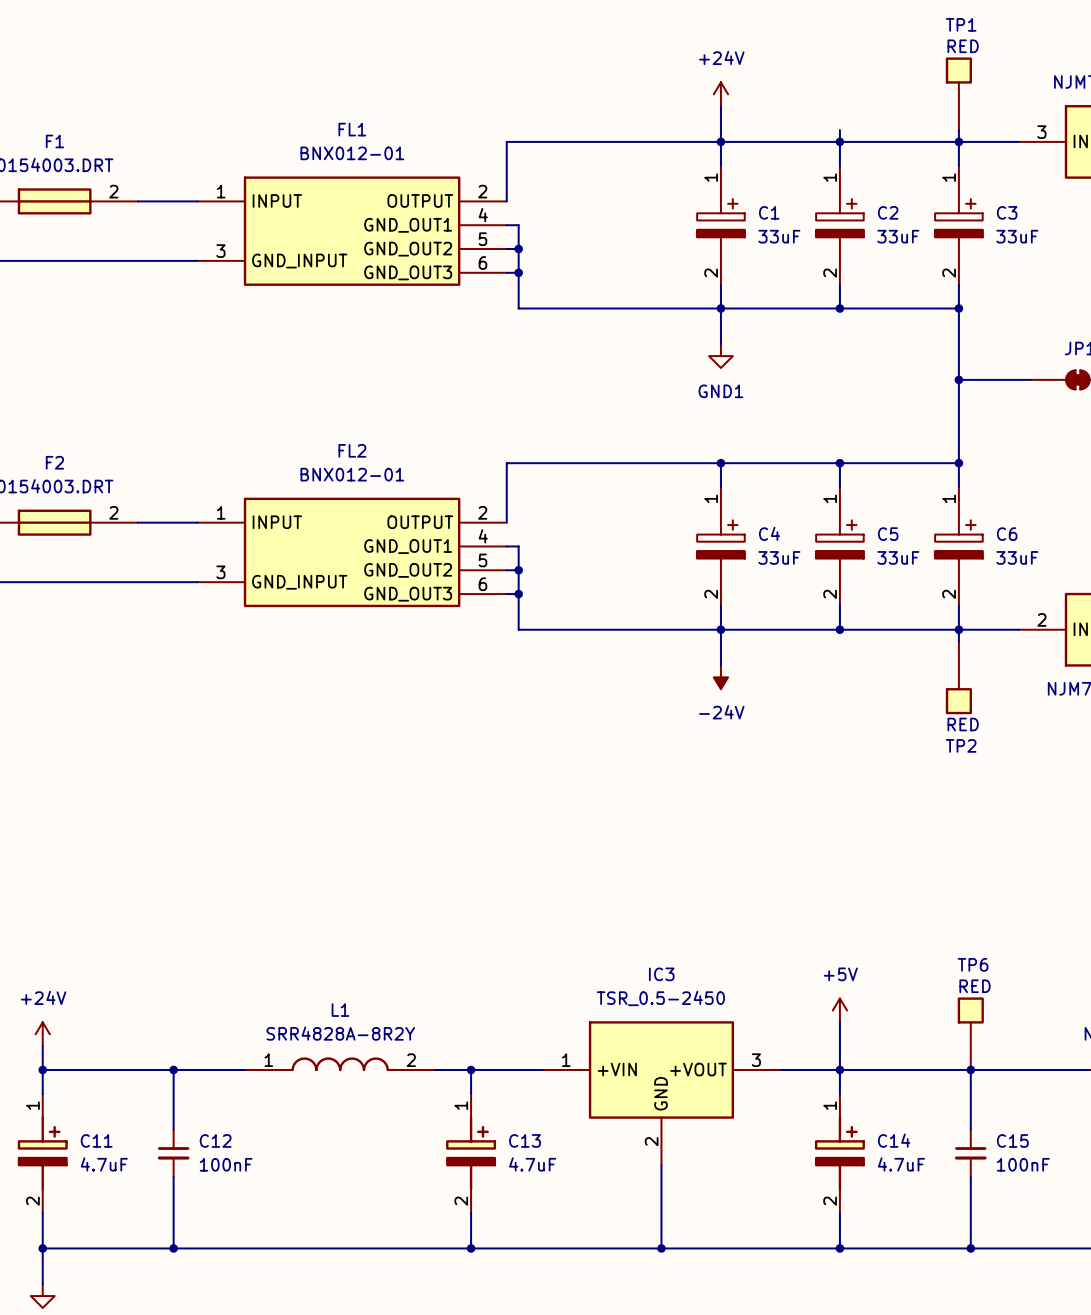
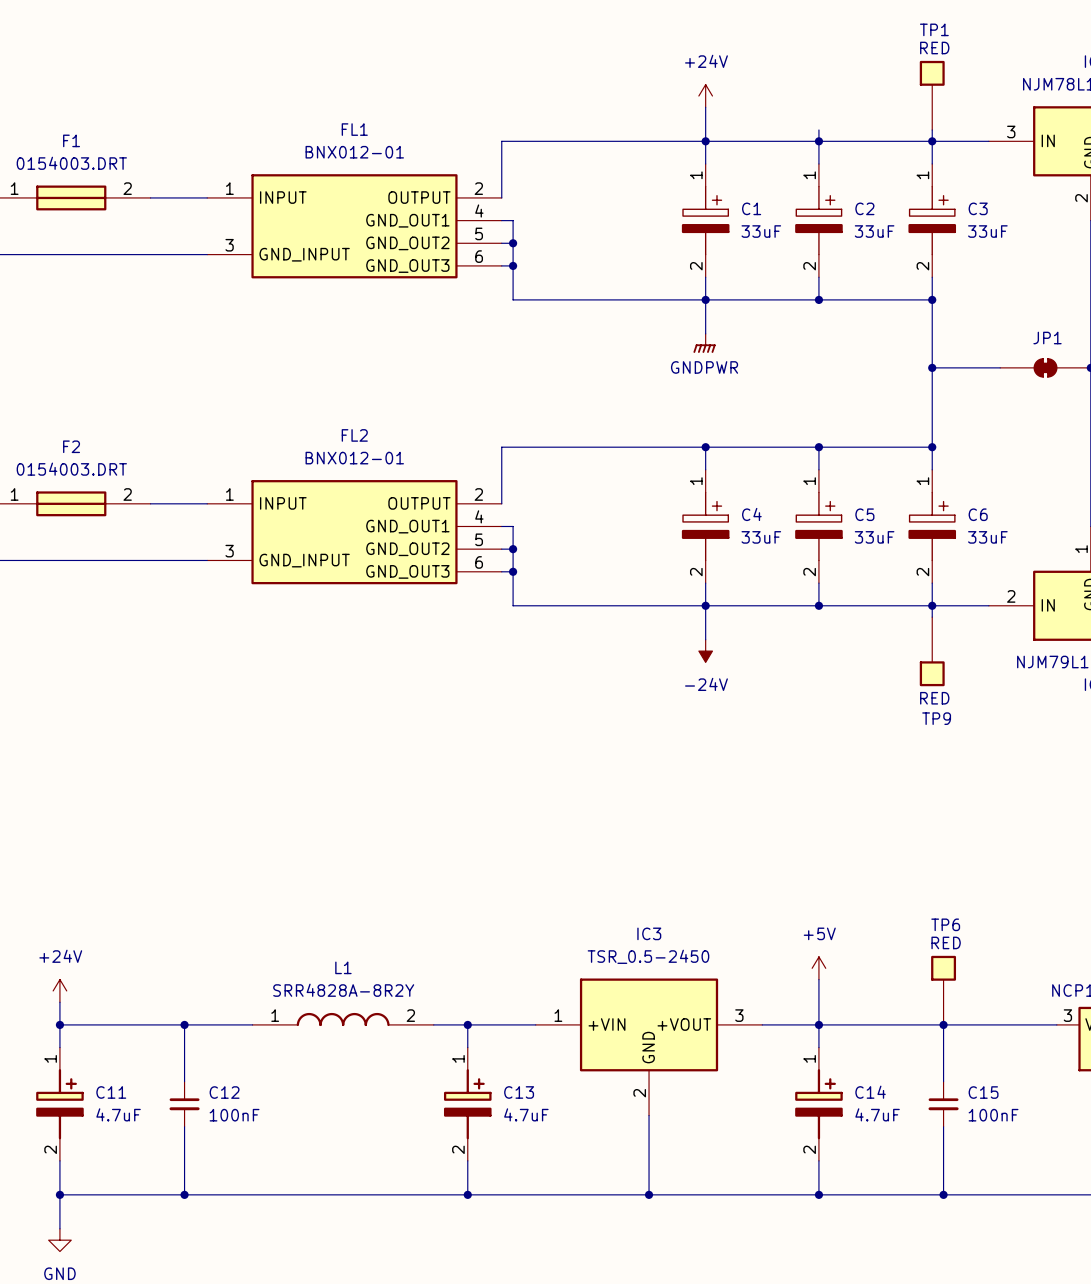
TP1 text: none -> RED (934, 48)
TP1 value: RED (963, 46) -> none
power symbol: GND1 (720, 356) -> GNDPWR (704, 343)
TP2 value: RED (963, 724) -> none
TP2 text: none -> RED (934, 698)
TP2 name: TP2 (961, 745) -> TP9 (936, 718)
TP6 text: none -> RED (946, 942)
TP6 value: RED (975, 986) -> none

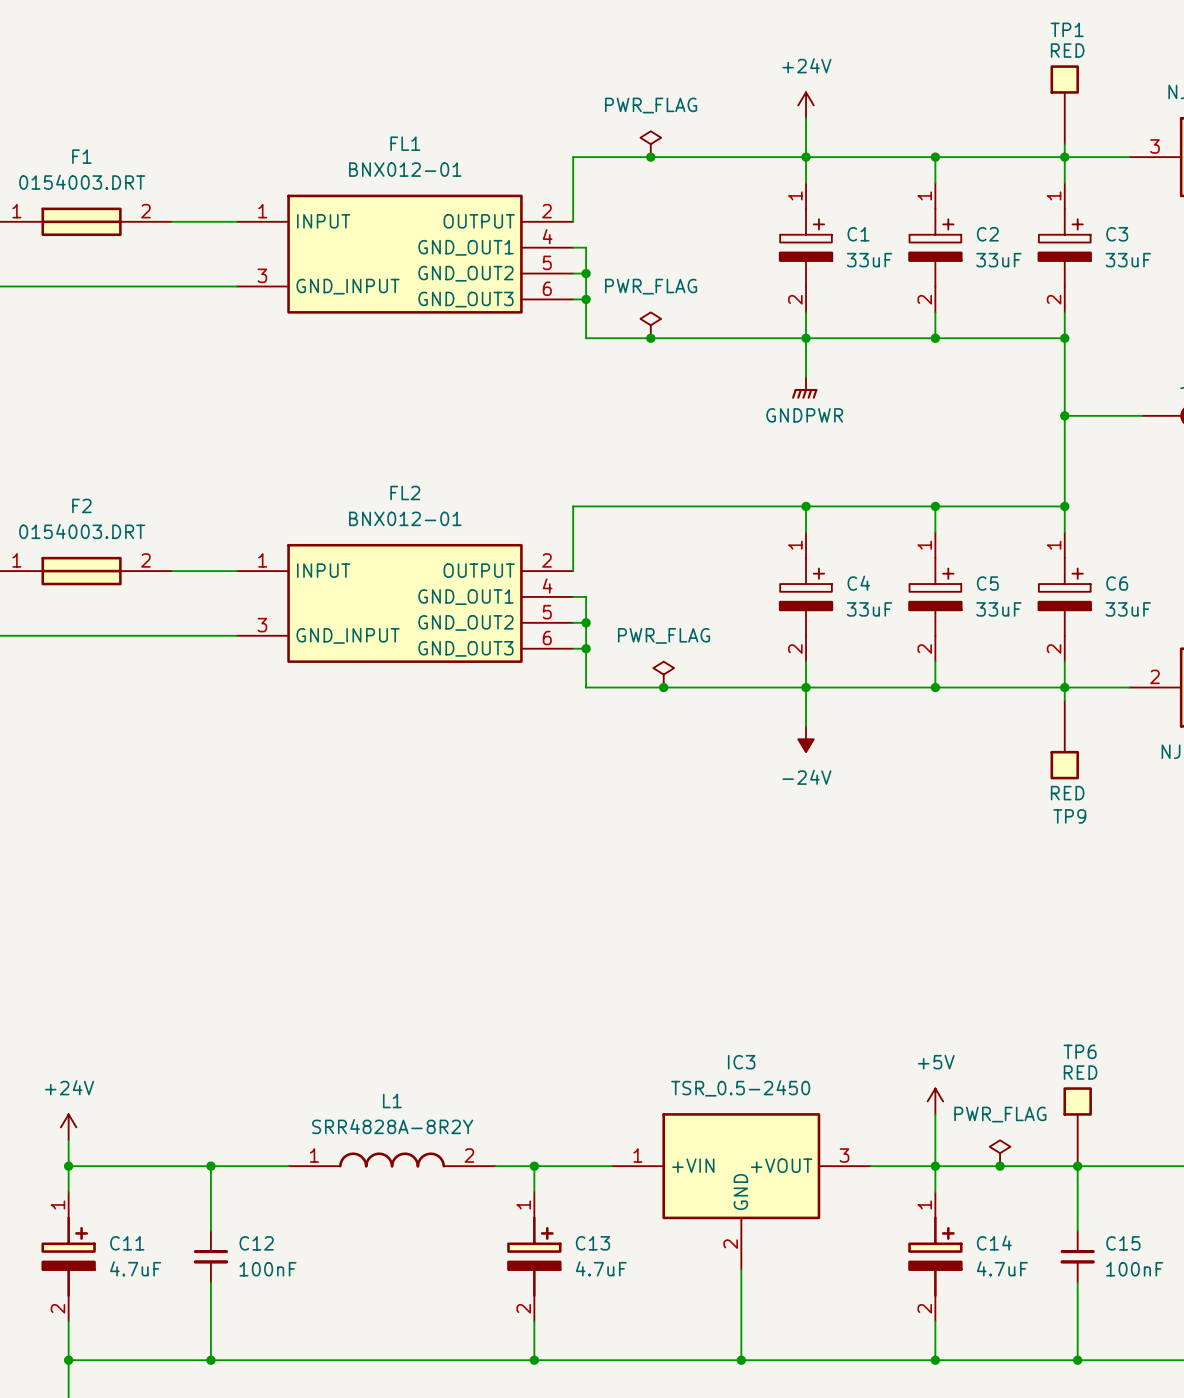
power symbol: none -> PWR_FLAG (650, 144)
wire: (818, 129) (818, 141) -> none
junction: none -> (650, 157)
power symbol: none -> PWR_FLAG (650, 325)
junction: none -> (650, 338)
power symbol: none -> PWR_FLAG (663, 674)
junction: none -> (663, 687)
power symbol: none -> PWR_FLAG (1000, 1153)
junction: none -> (1000, 1166)

